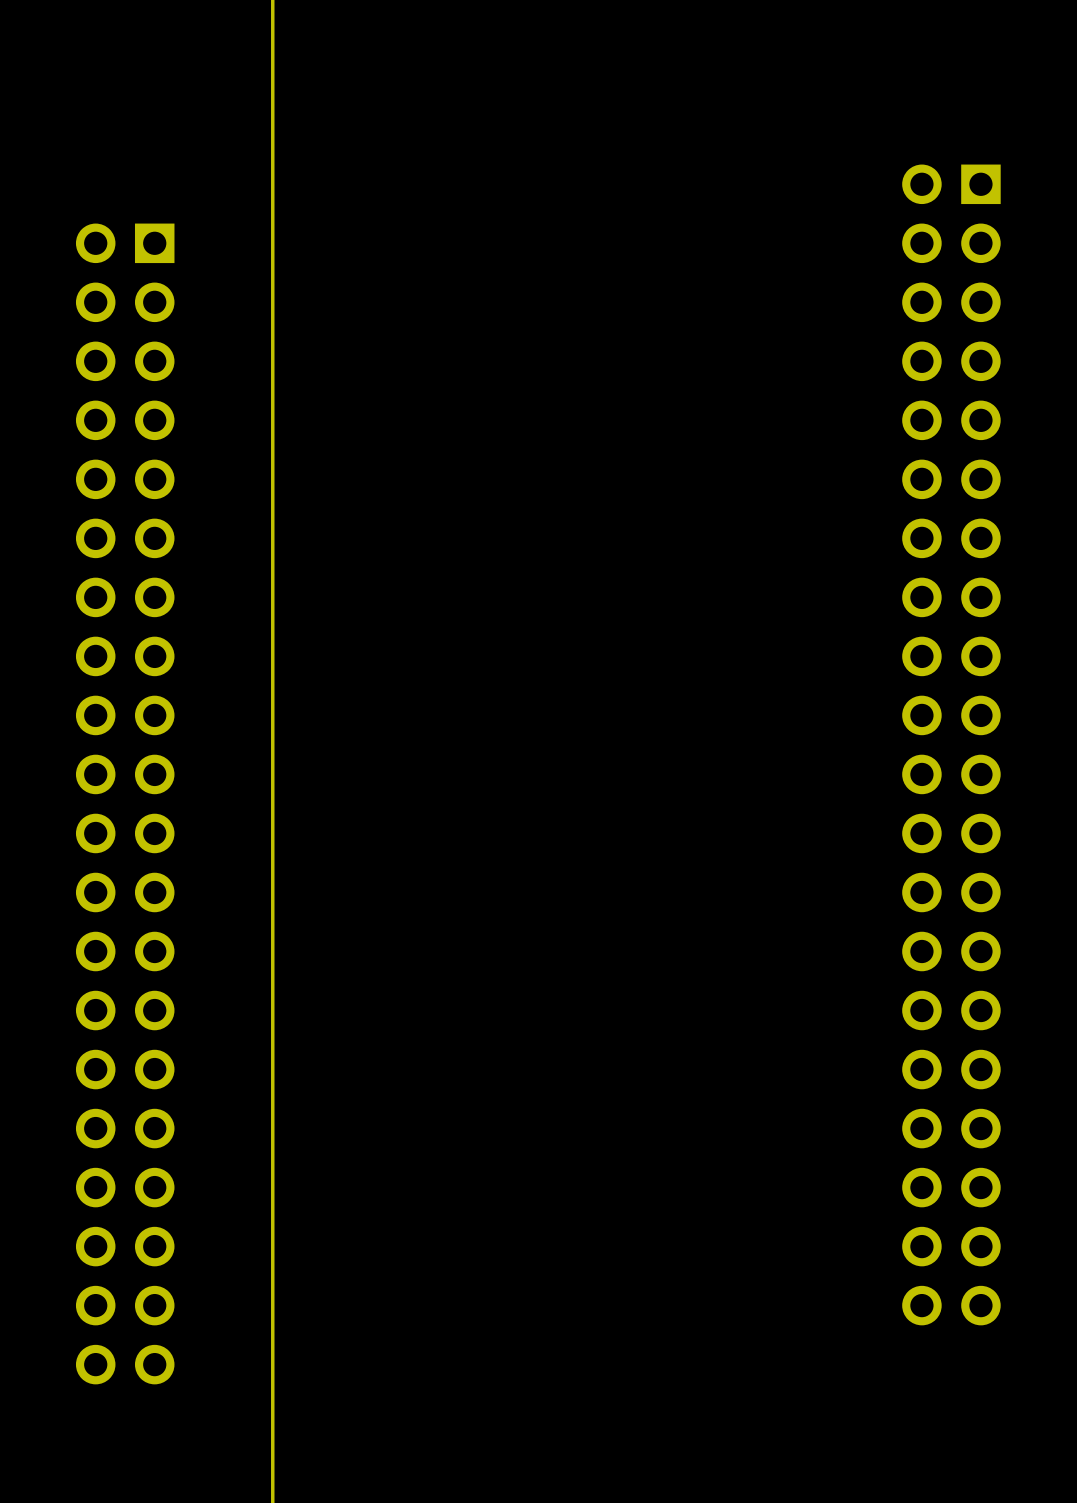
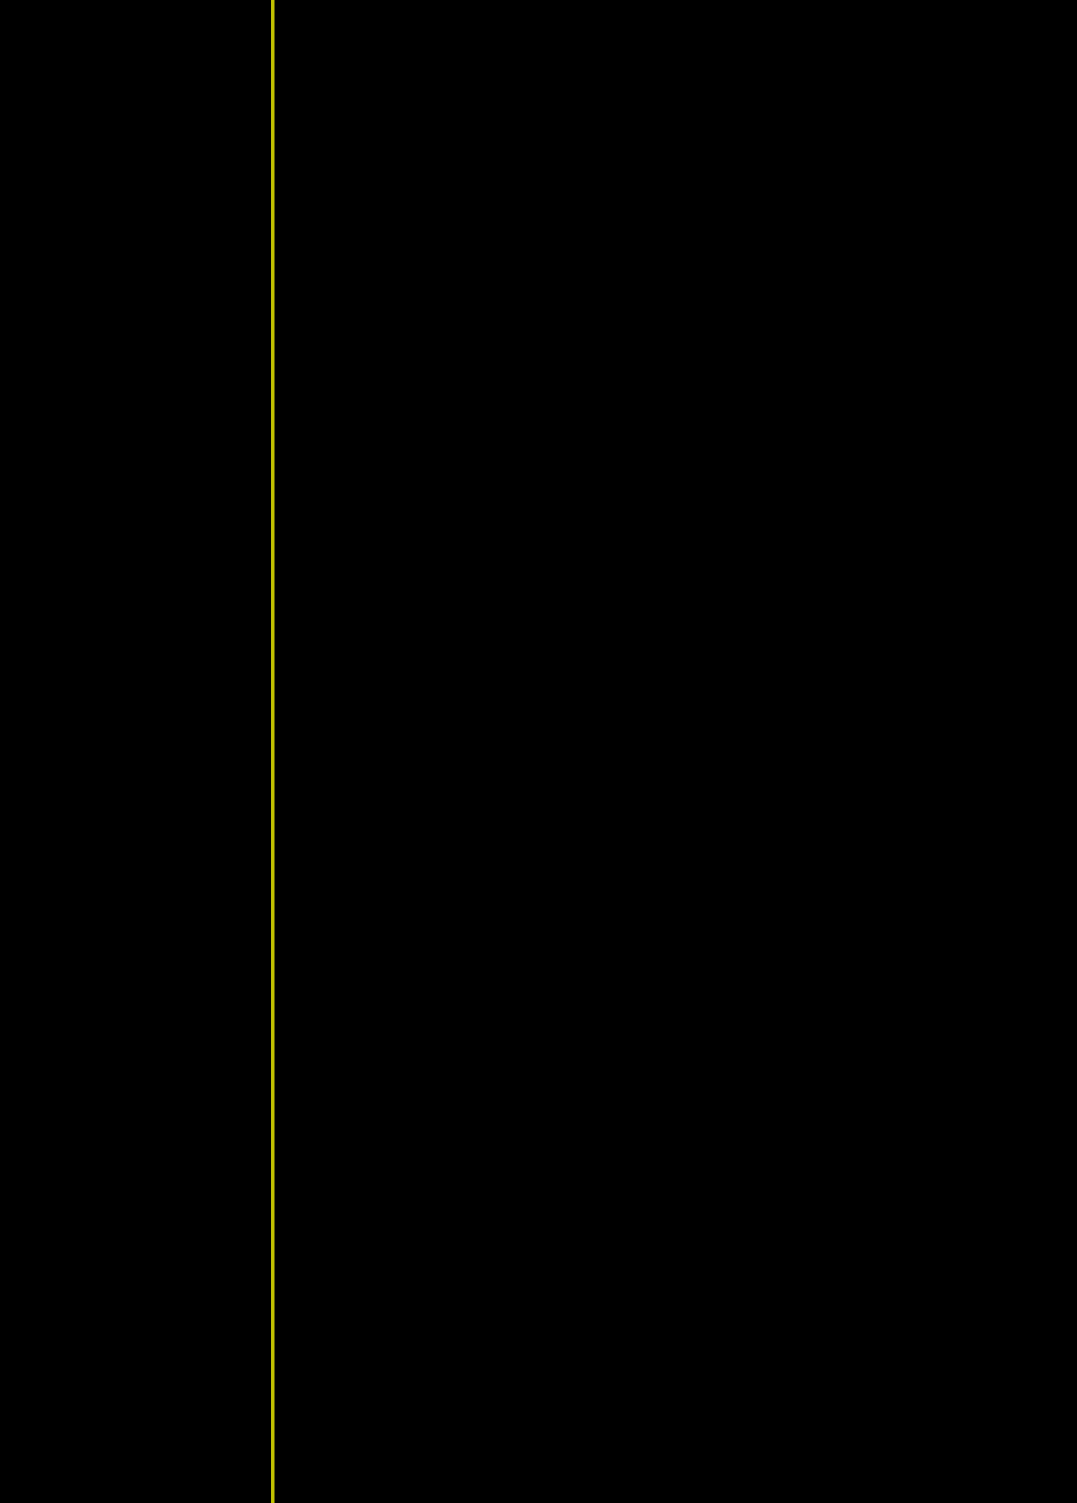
part: (951, 744) -> none
part: (125, 803) -> none

